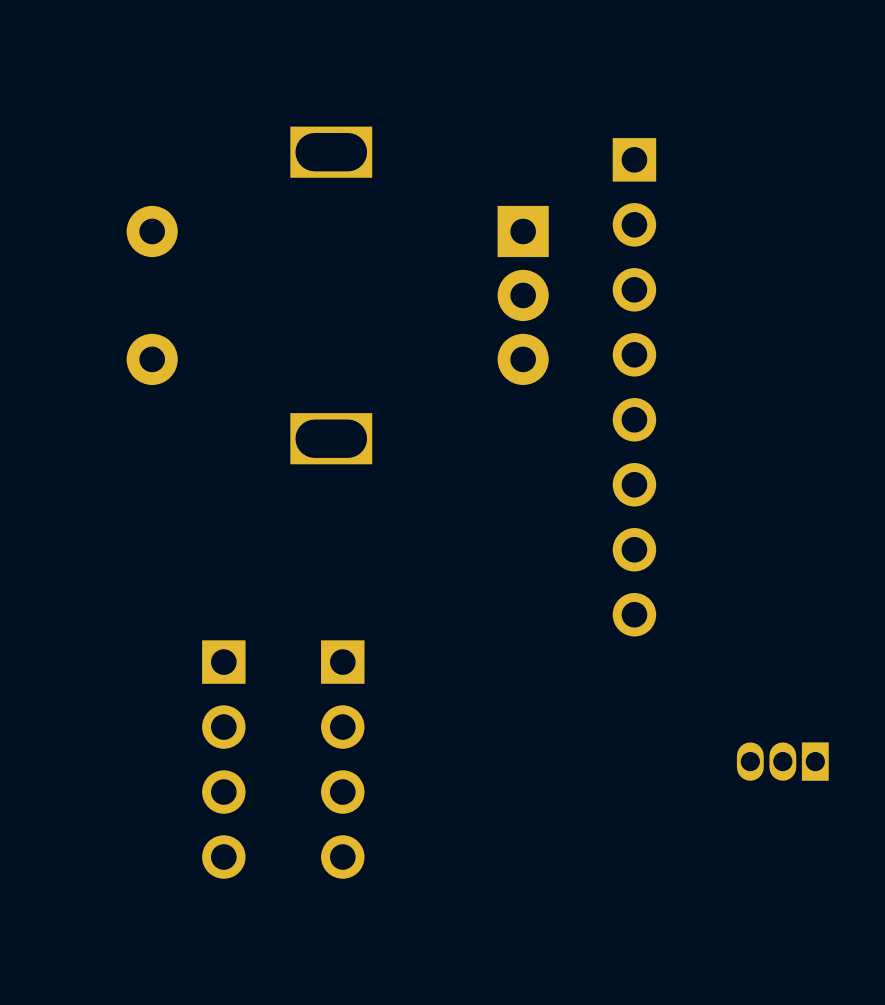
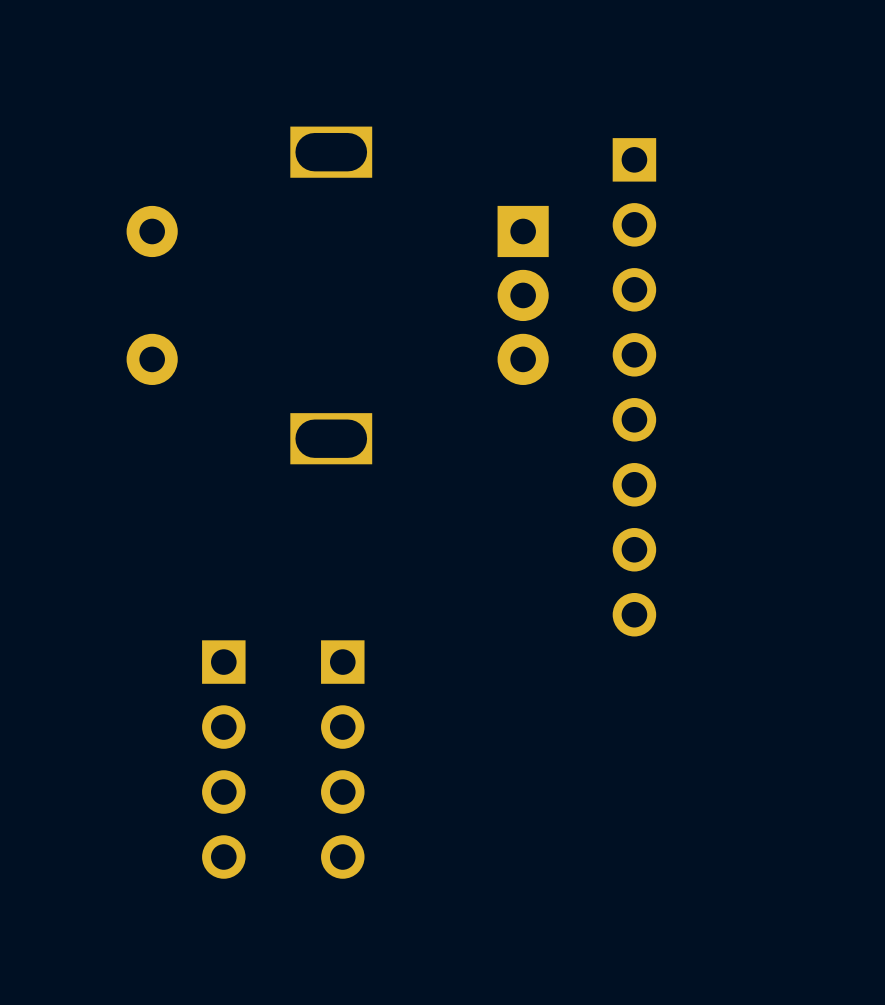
part: (782, 761) -> none

